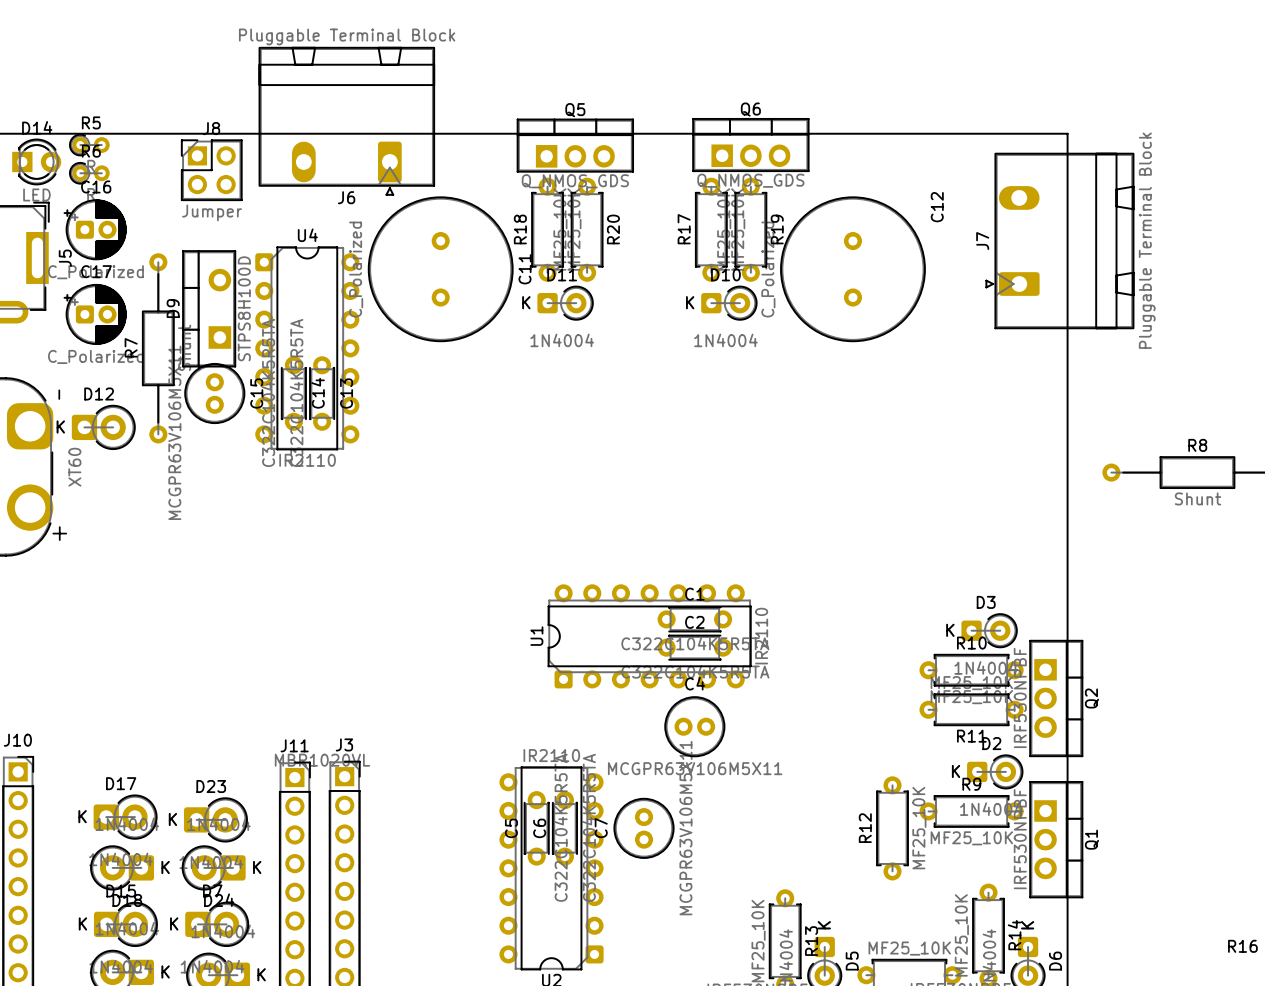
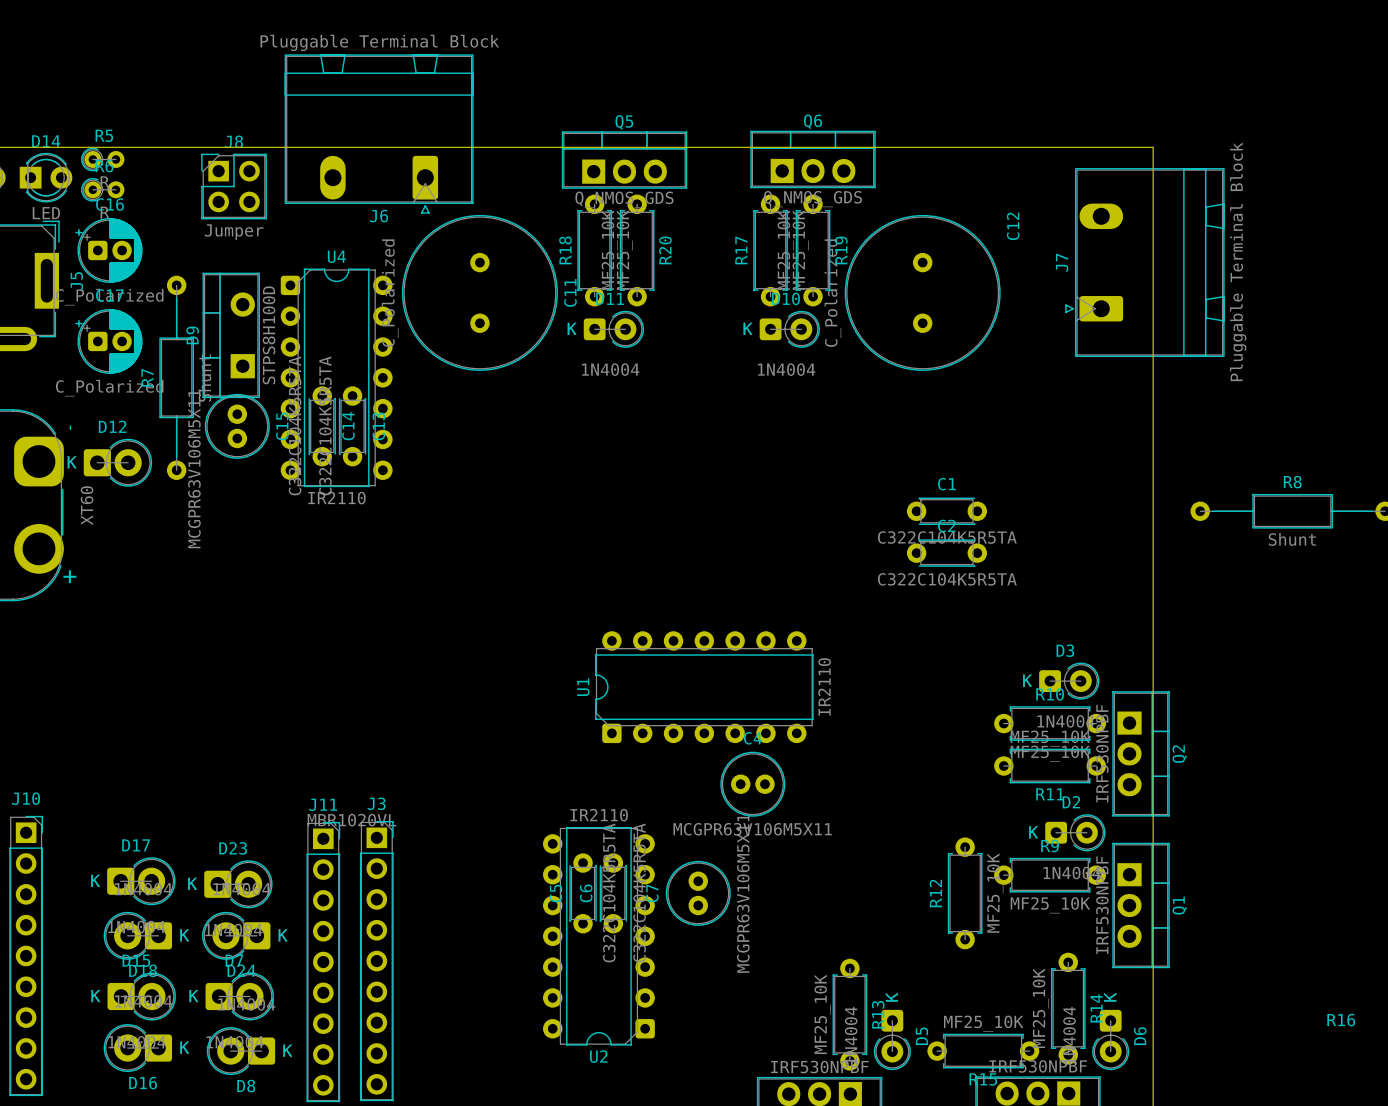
C1 position: (694, 619) -> (946, 511)
C2 position: (694, 647) -> (946, 553)

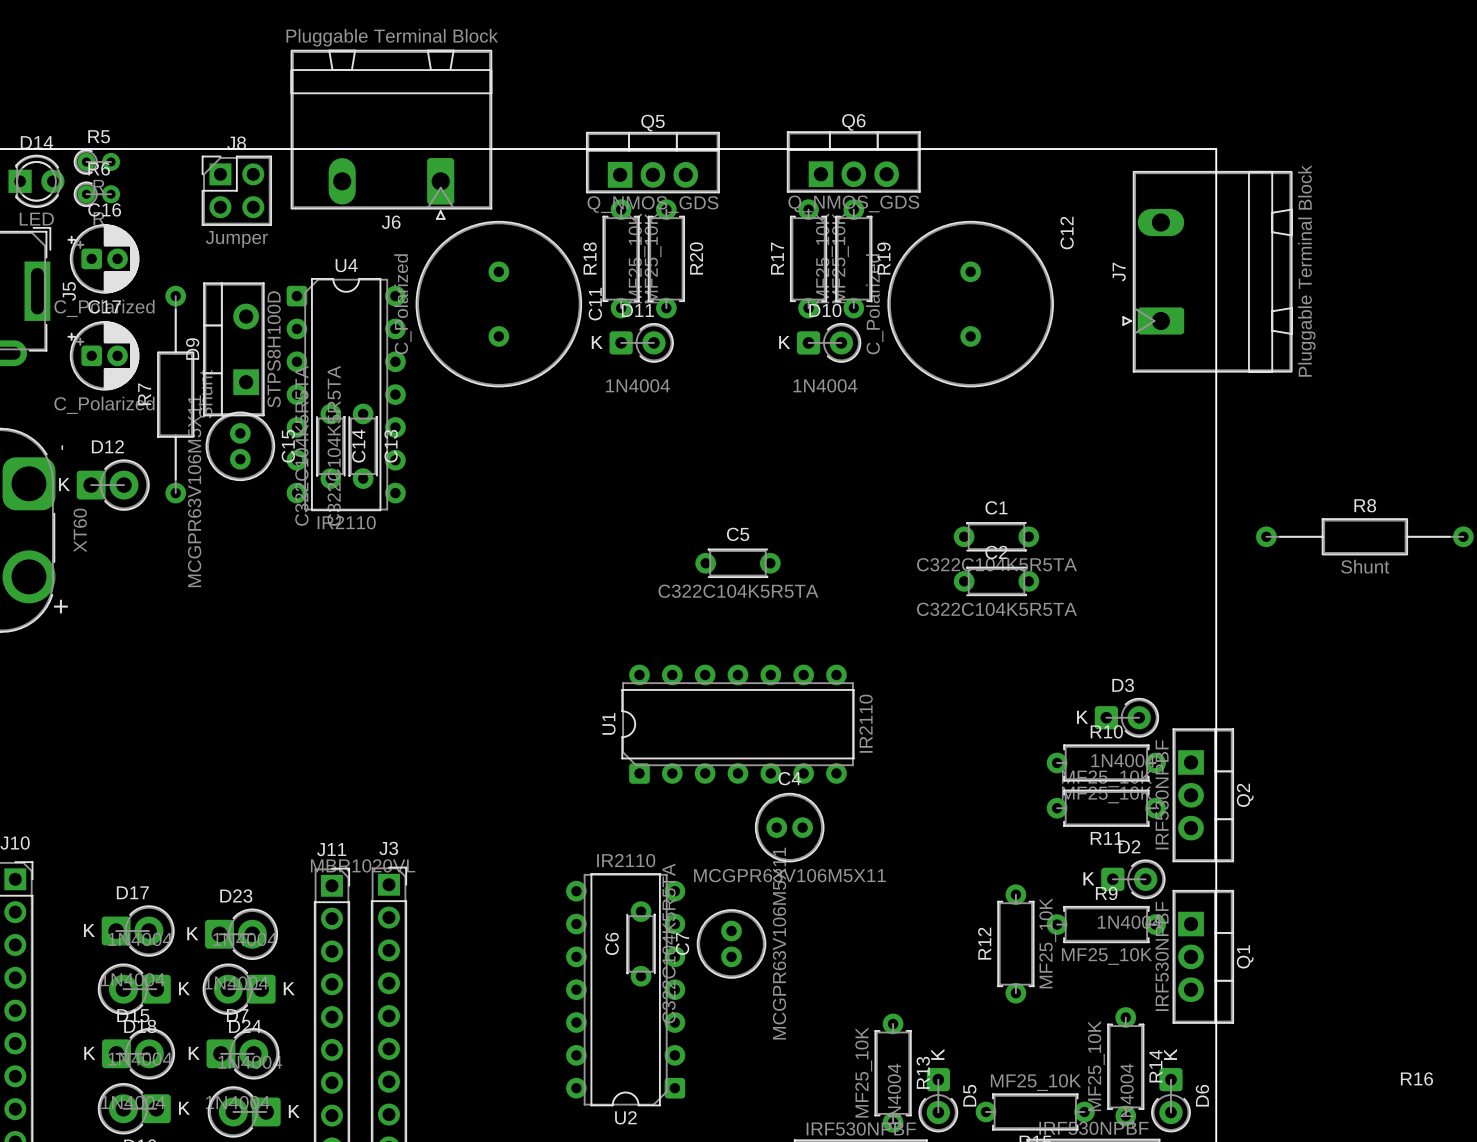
C5 rotation: 0° (583, 893) -> 90° clockwise (737, 563)
C5 position: (583, 893) -> (737, 563)

